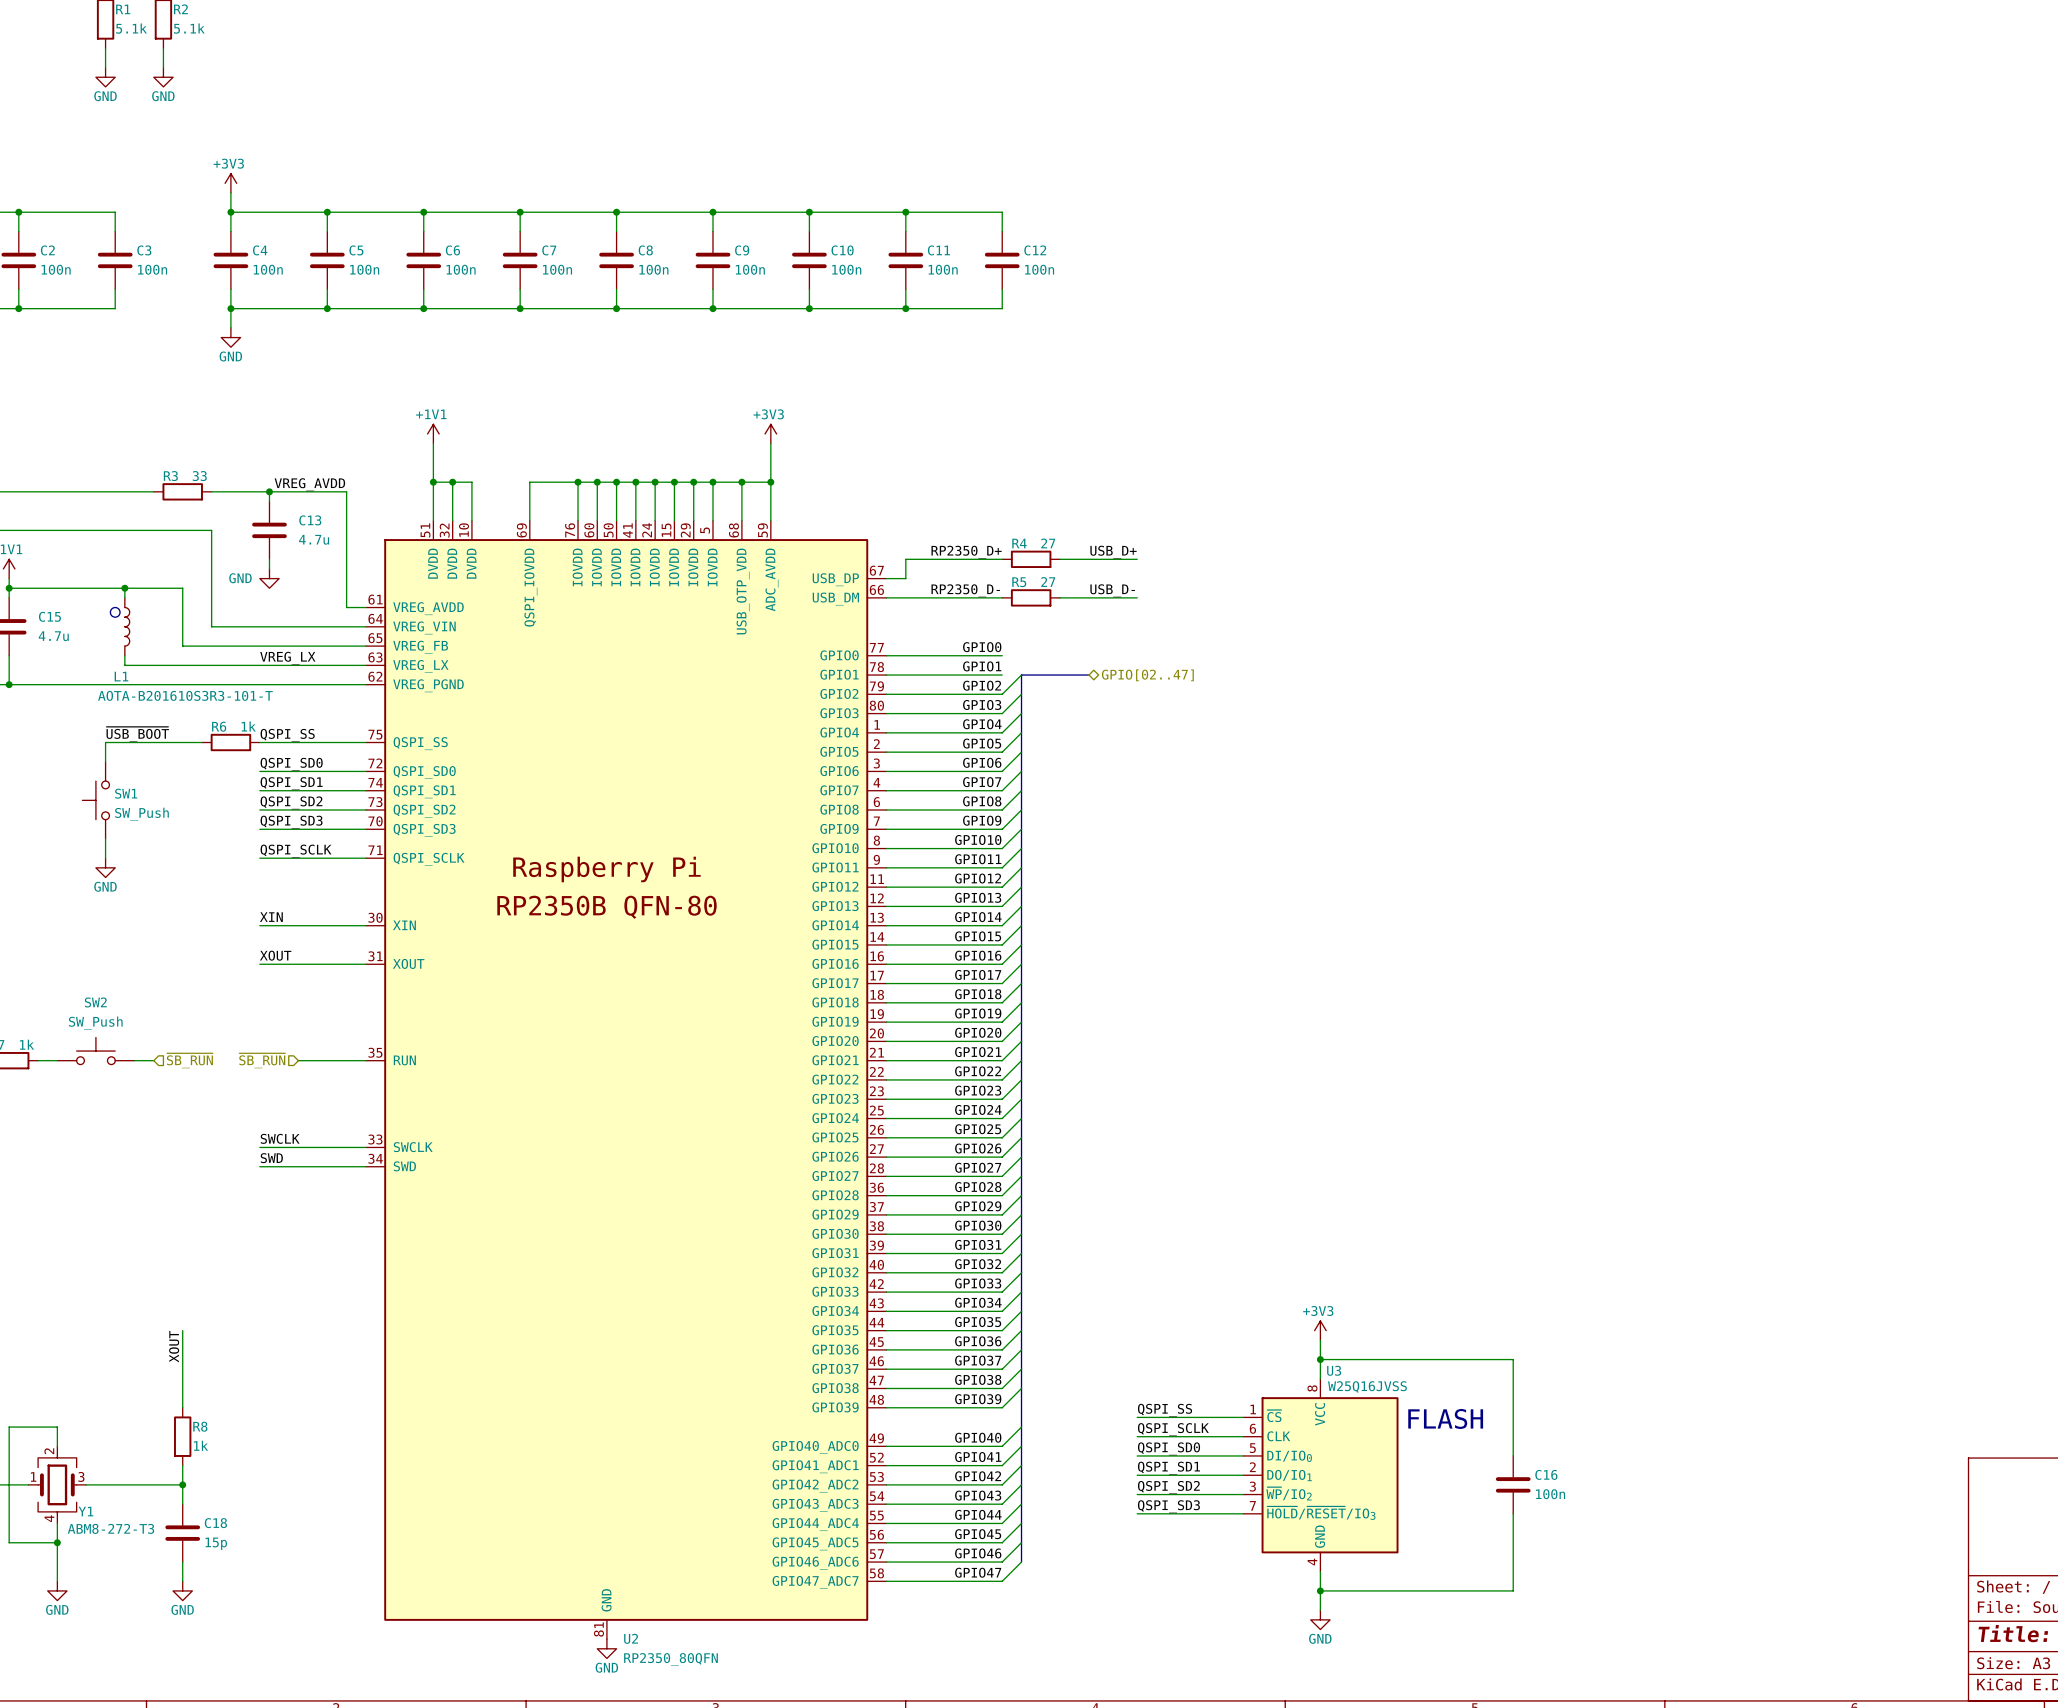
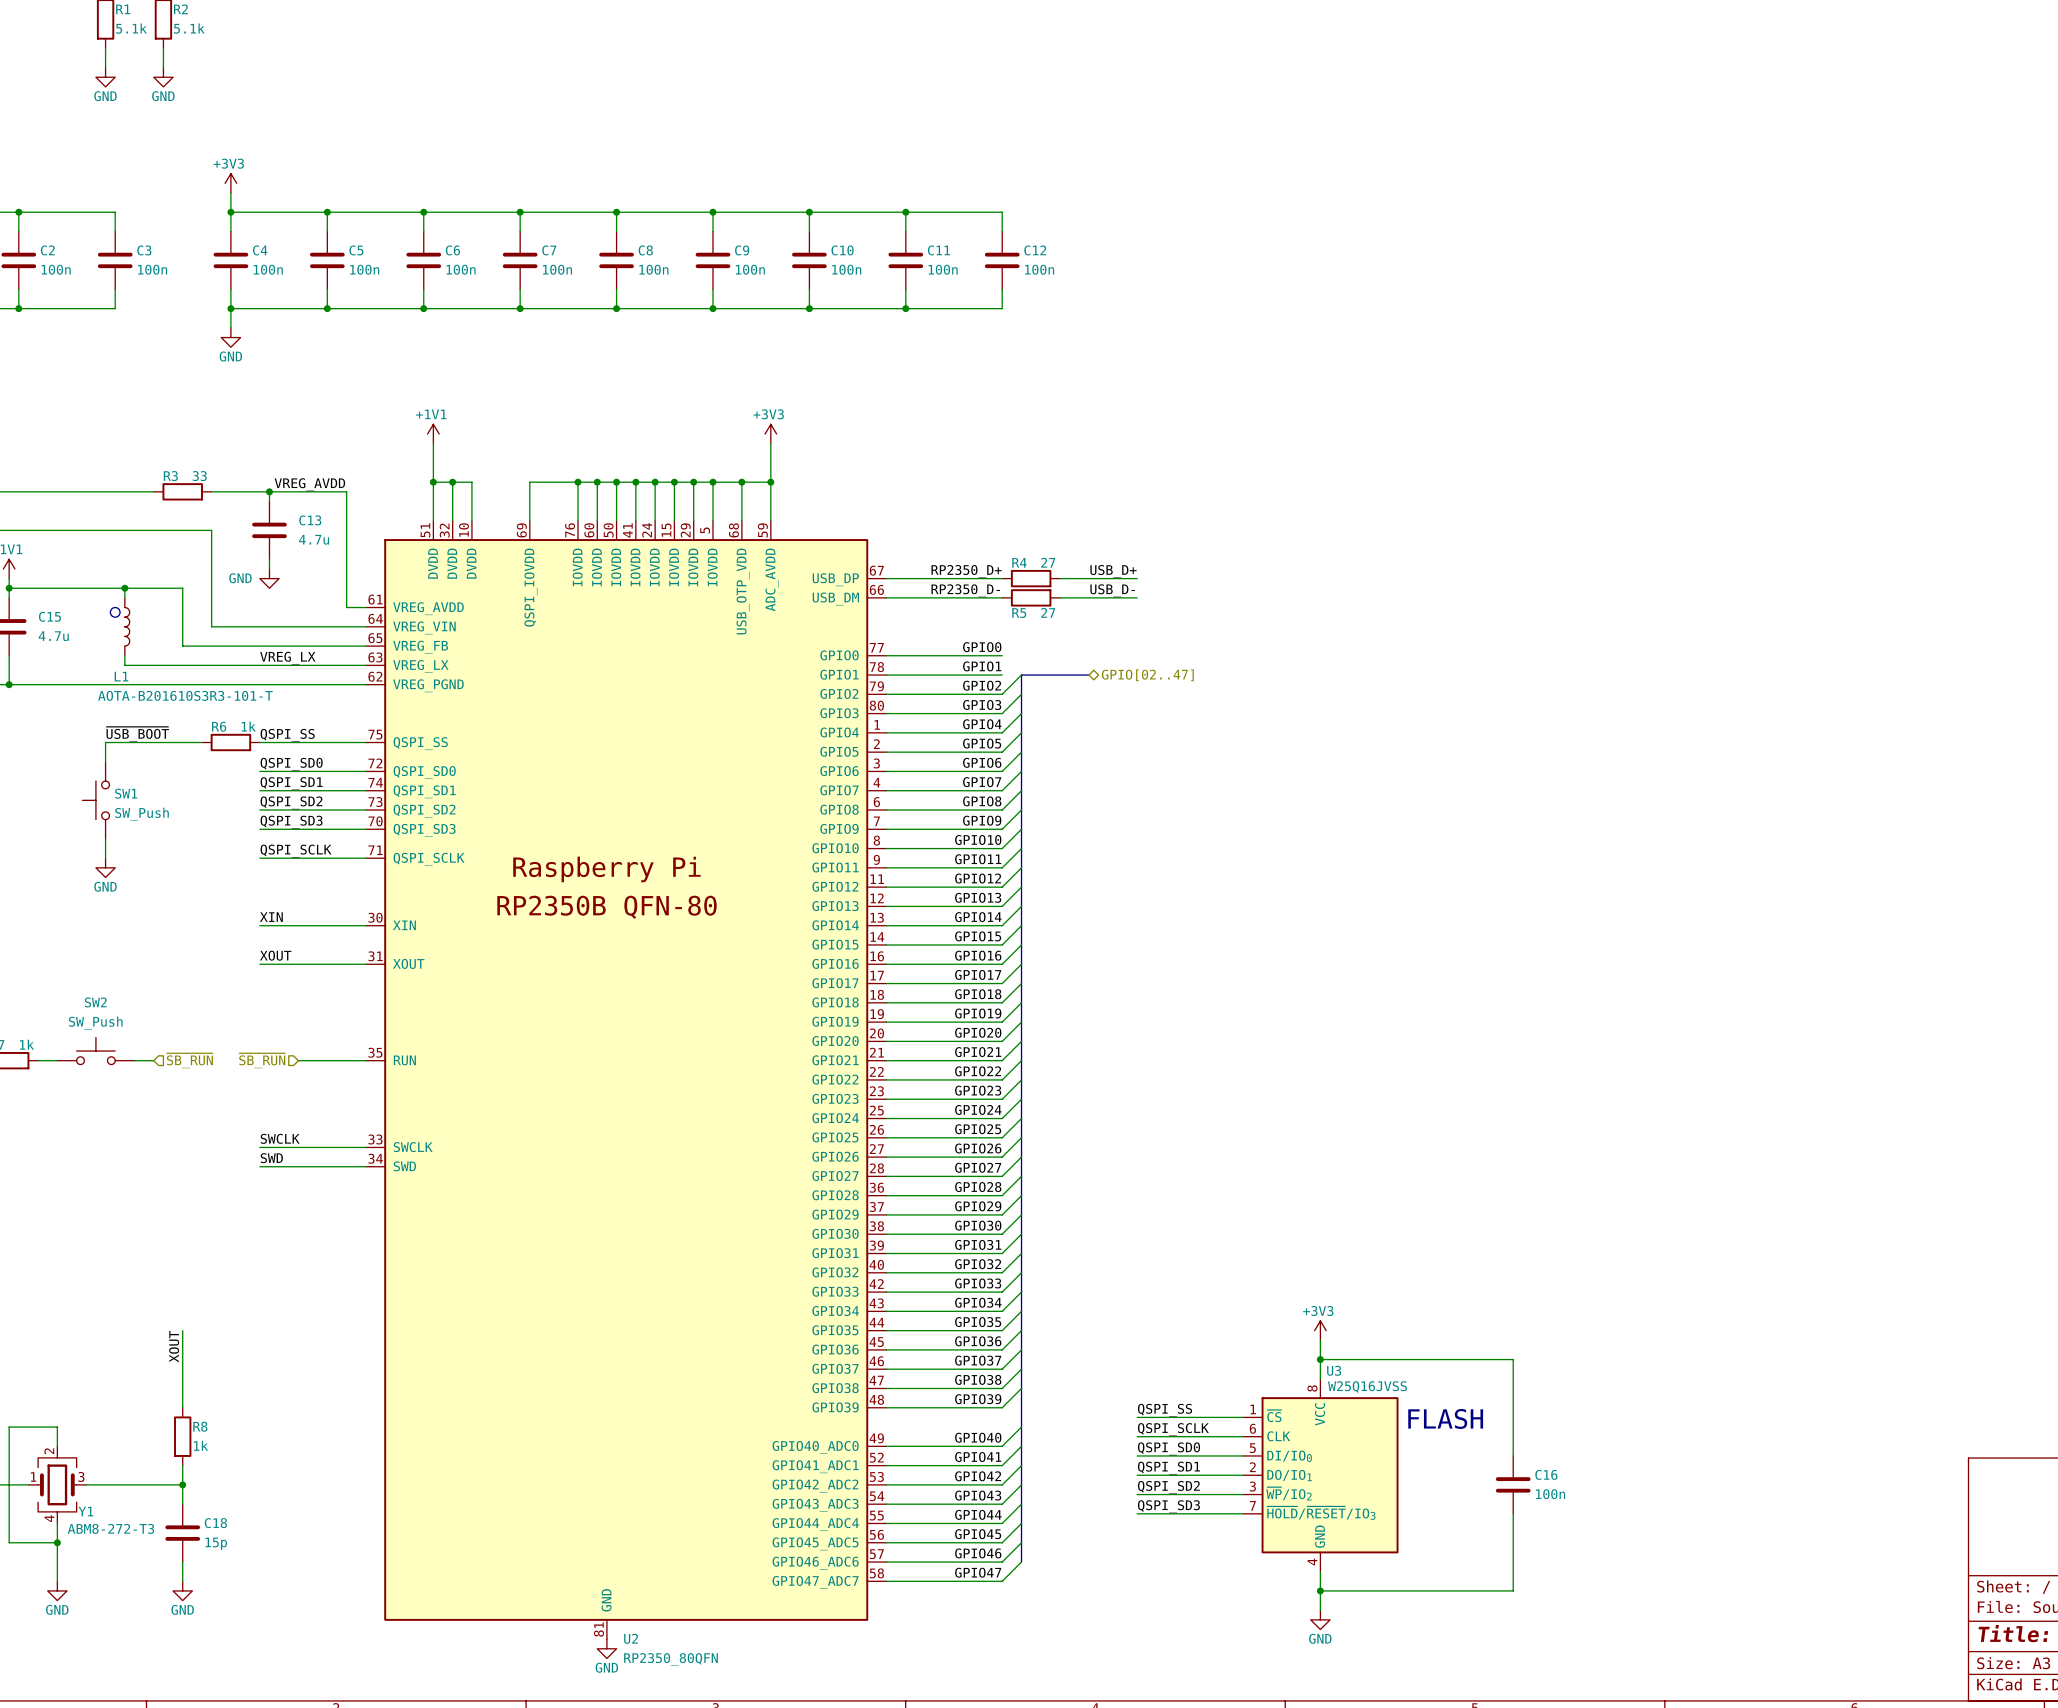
label position: RP2350_D+ (966, 552) -> RP2350_D+ (966, 571)
label position: USB_D+ (1113, 552) -> USB_D+ (1113, 571)
wire: (1002, 559) (905, 559) (905, 578) -> (1002, 578) (905, 578)
R4 position: (1031, 559) -> (1031, 578)
wire: (1060, 559) (1137, 559) -> (1060, 578) (1137, 578)
R5 name position: R5 (1019, 582) -> R5 (1019, 613)
R5 value position: 27 (1048, 582) -> 27 (1048, 612)

